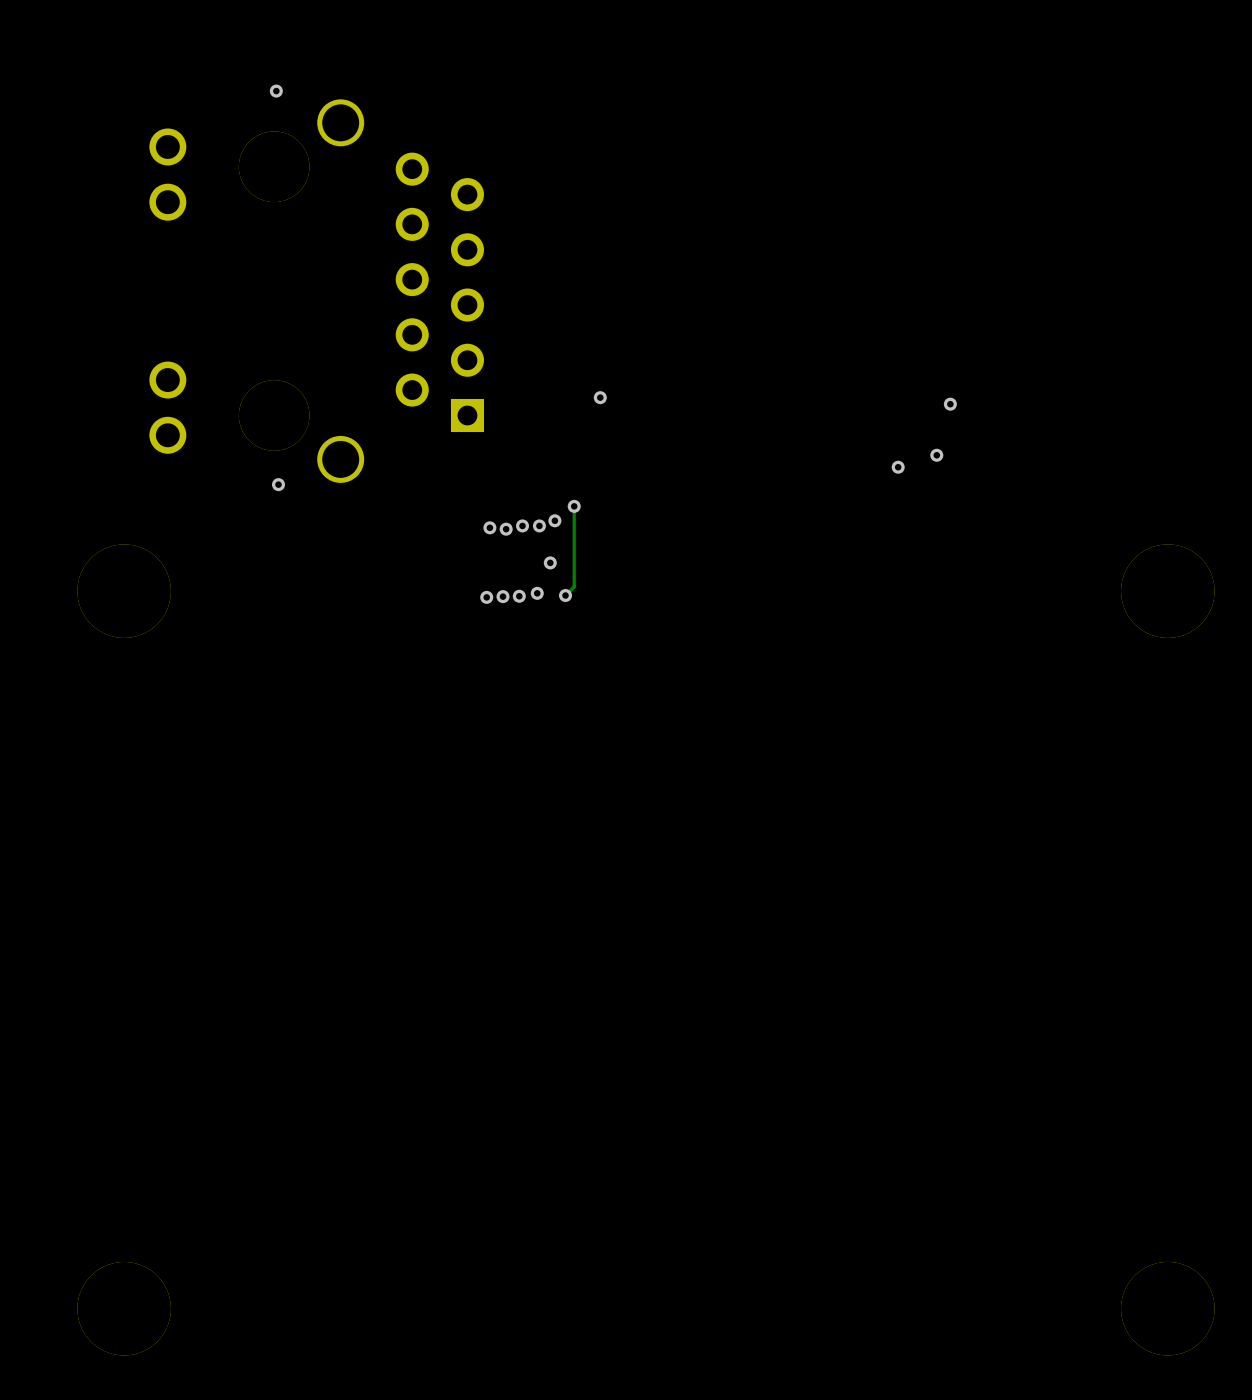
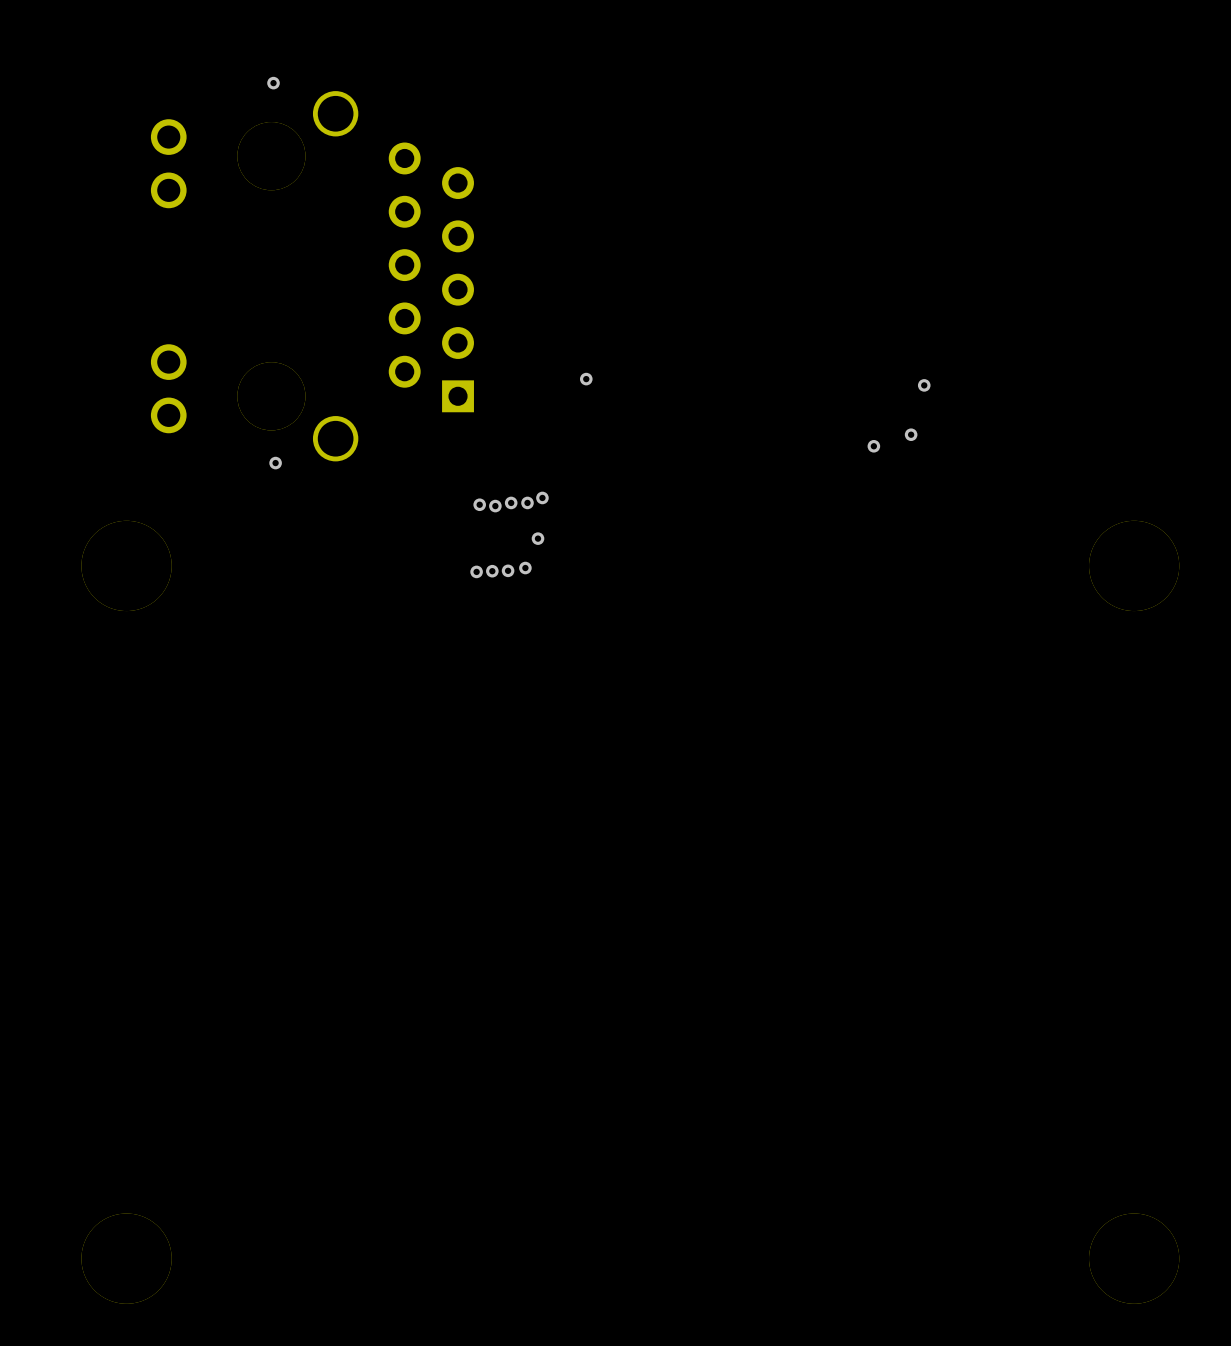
track: (574, 506) (574, 586) (565, 595) -> none
via: (574, 506) -> none
via: (565, 595) -> none

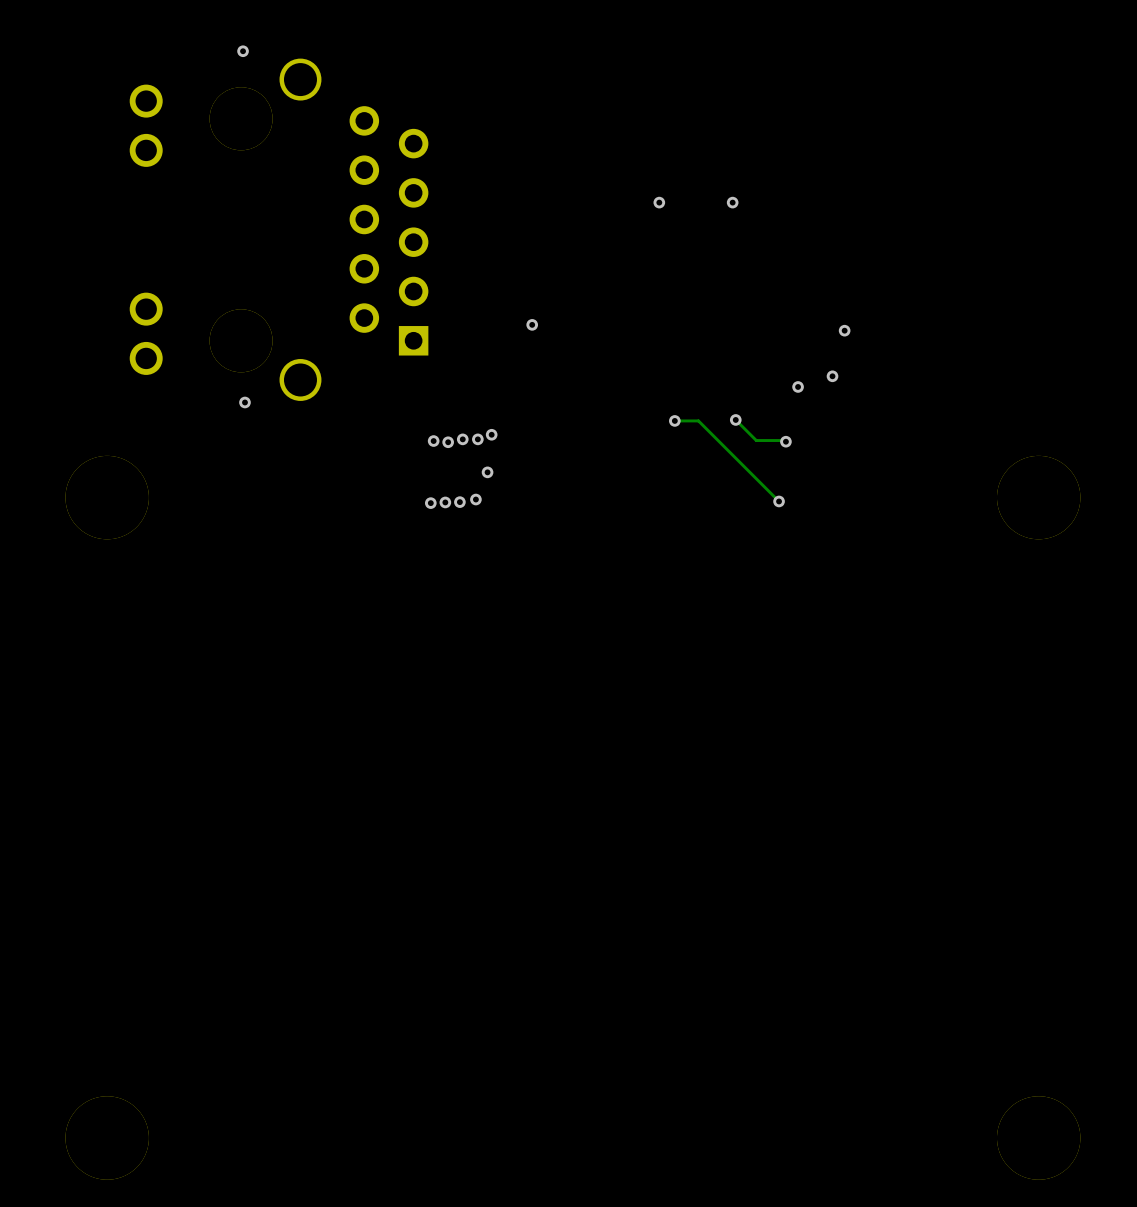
via: none -> (659, 202)
via: none -> (732, 202)
track: none -> (735, 419) (756, 440) (785, 441)
via: none -> (735, 419)
track: none -> (674, 420) (698, 420) (779, 501)
via: none -> (674, 420)
via: none -> (785, 441)
via: none -> (779, 501)

